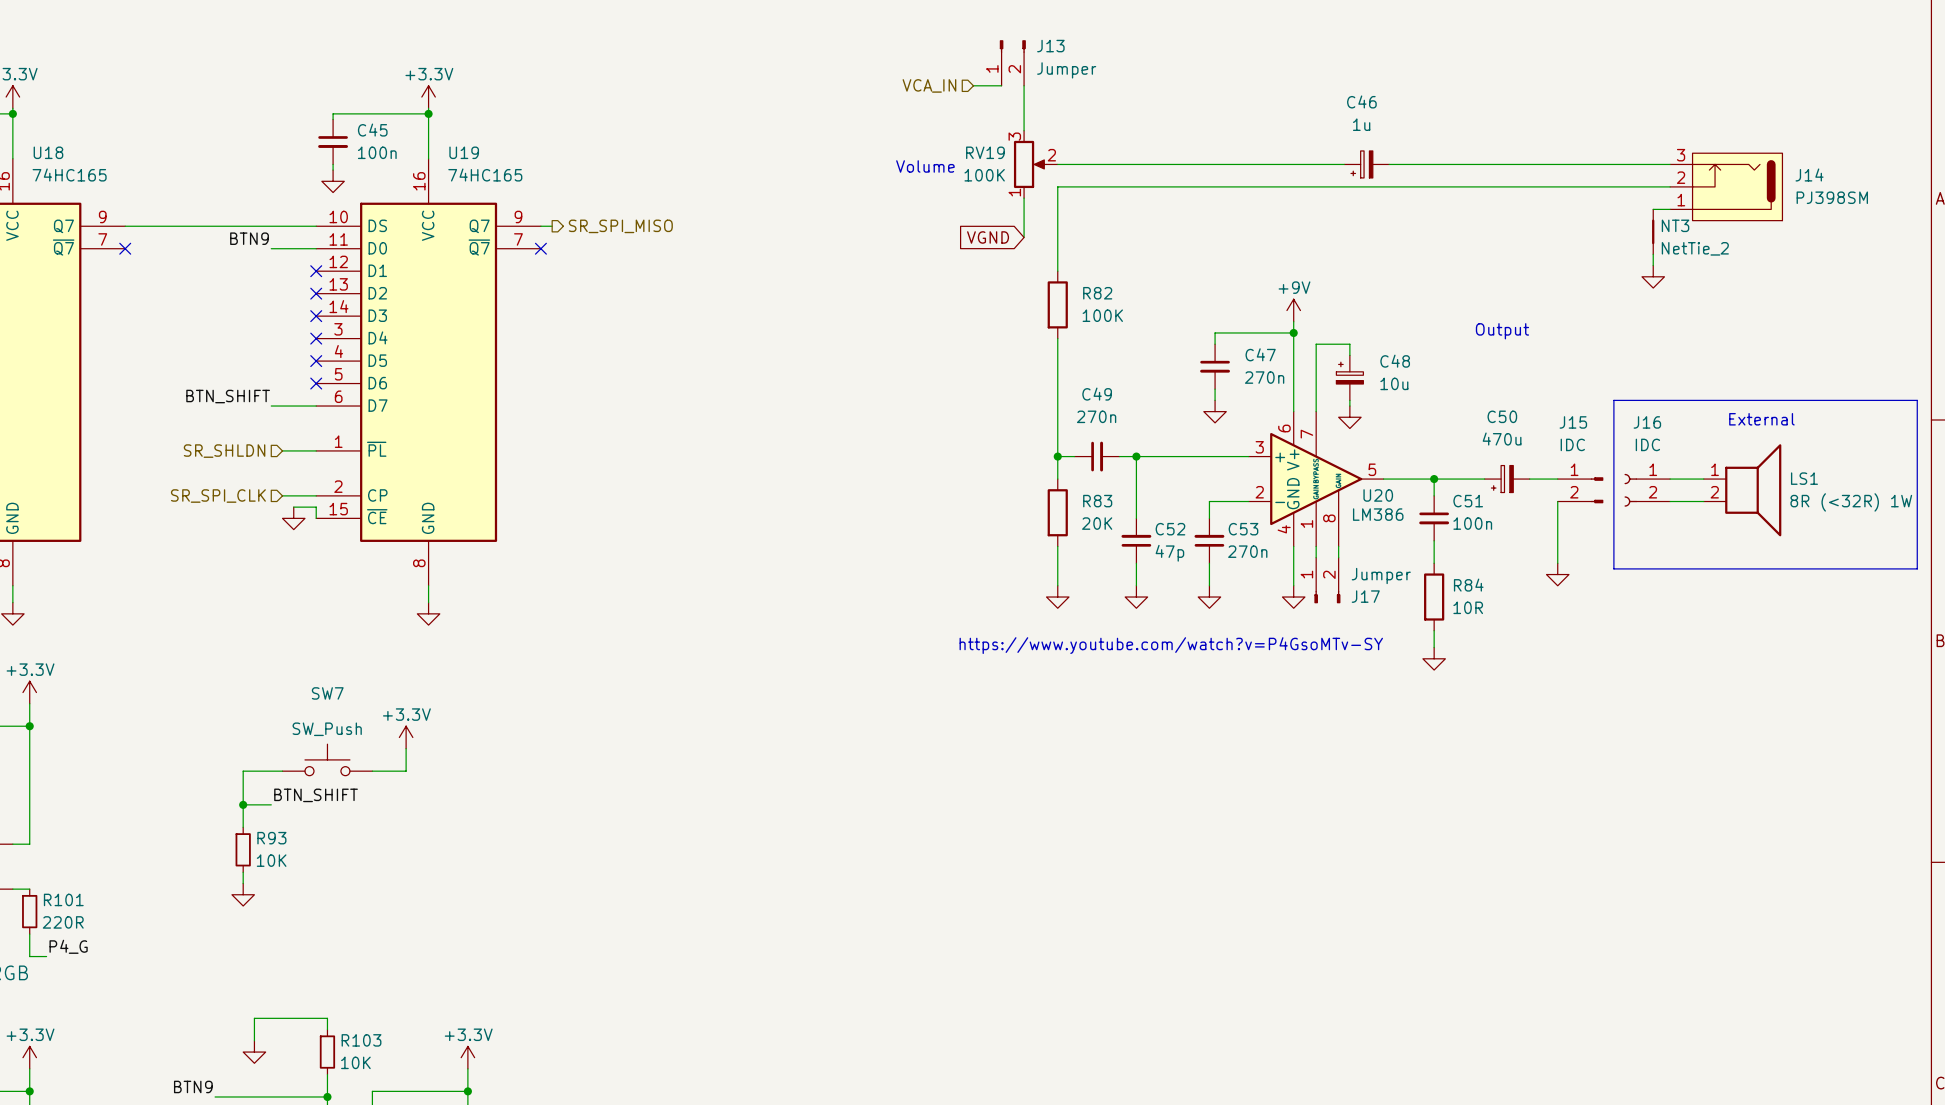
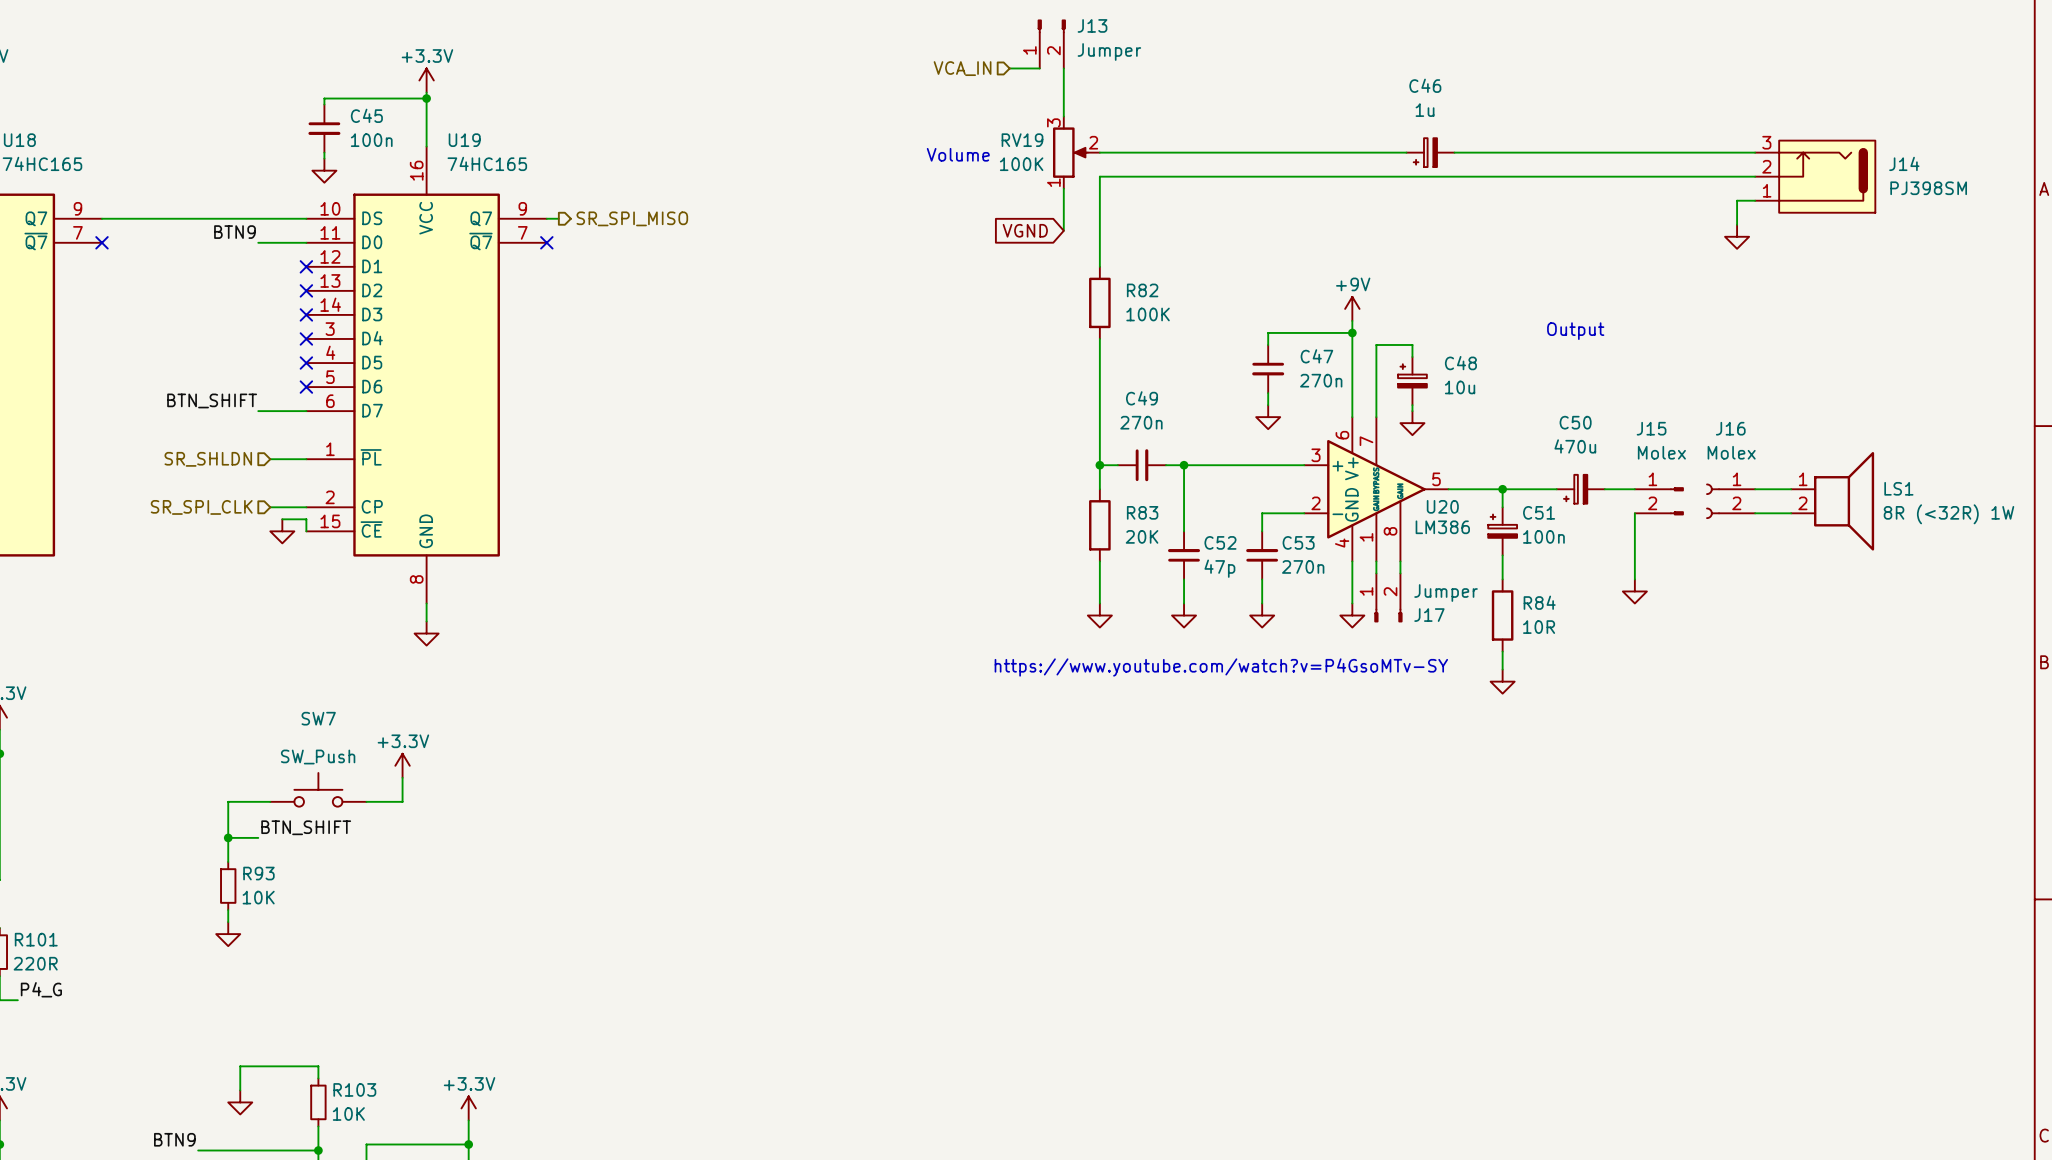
NT3: NetTie_2 (1653, 231) -> none
wire: (1653, 254) (1653, 265) -> none
power symbol position: (1653, 276) -> (1737, 236)
line: (1613, 400) (1917, 400) (1917, 568) (1613, 568) (1613, 400) -> none
text: External (1761, 419) -> none
J15 value: IDC (1572, 444) -> Molex (1661, 452)
J16 value: IDC (1647, 444) -> Molex (1731, 452)
C51 symbol: [1419, 495, 1450, 541] -> [1488, 507, 1518, 556]

